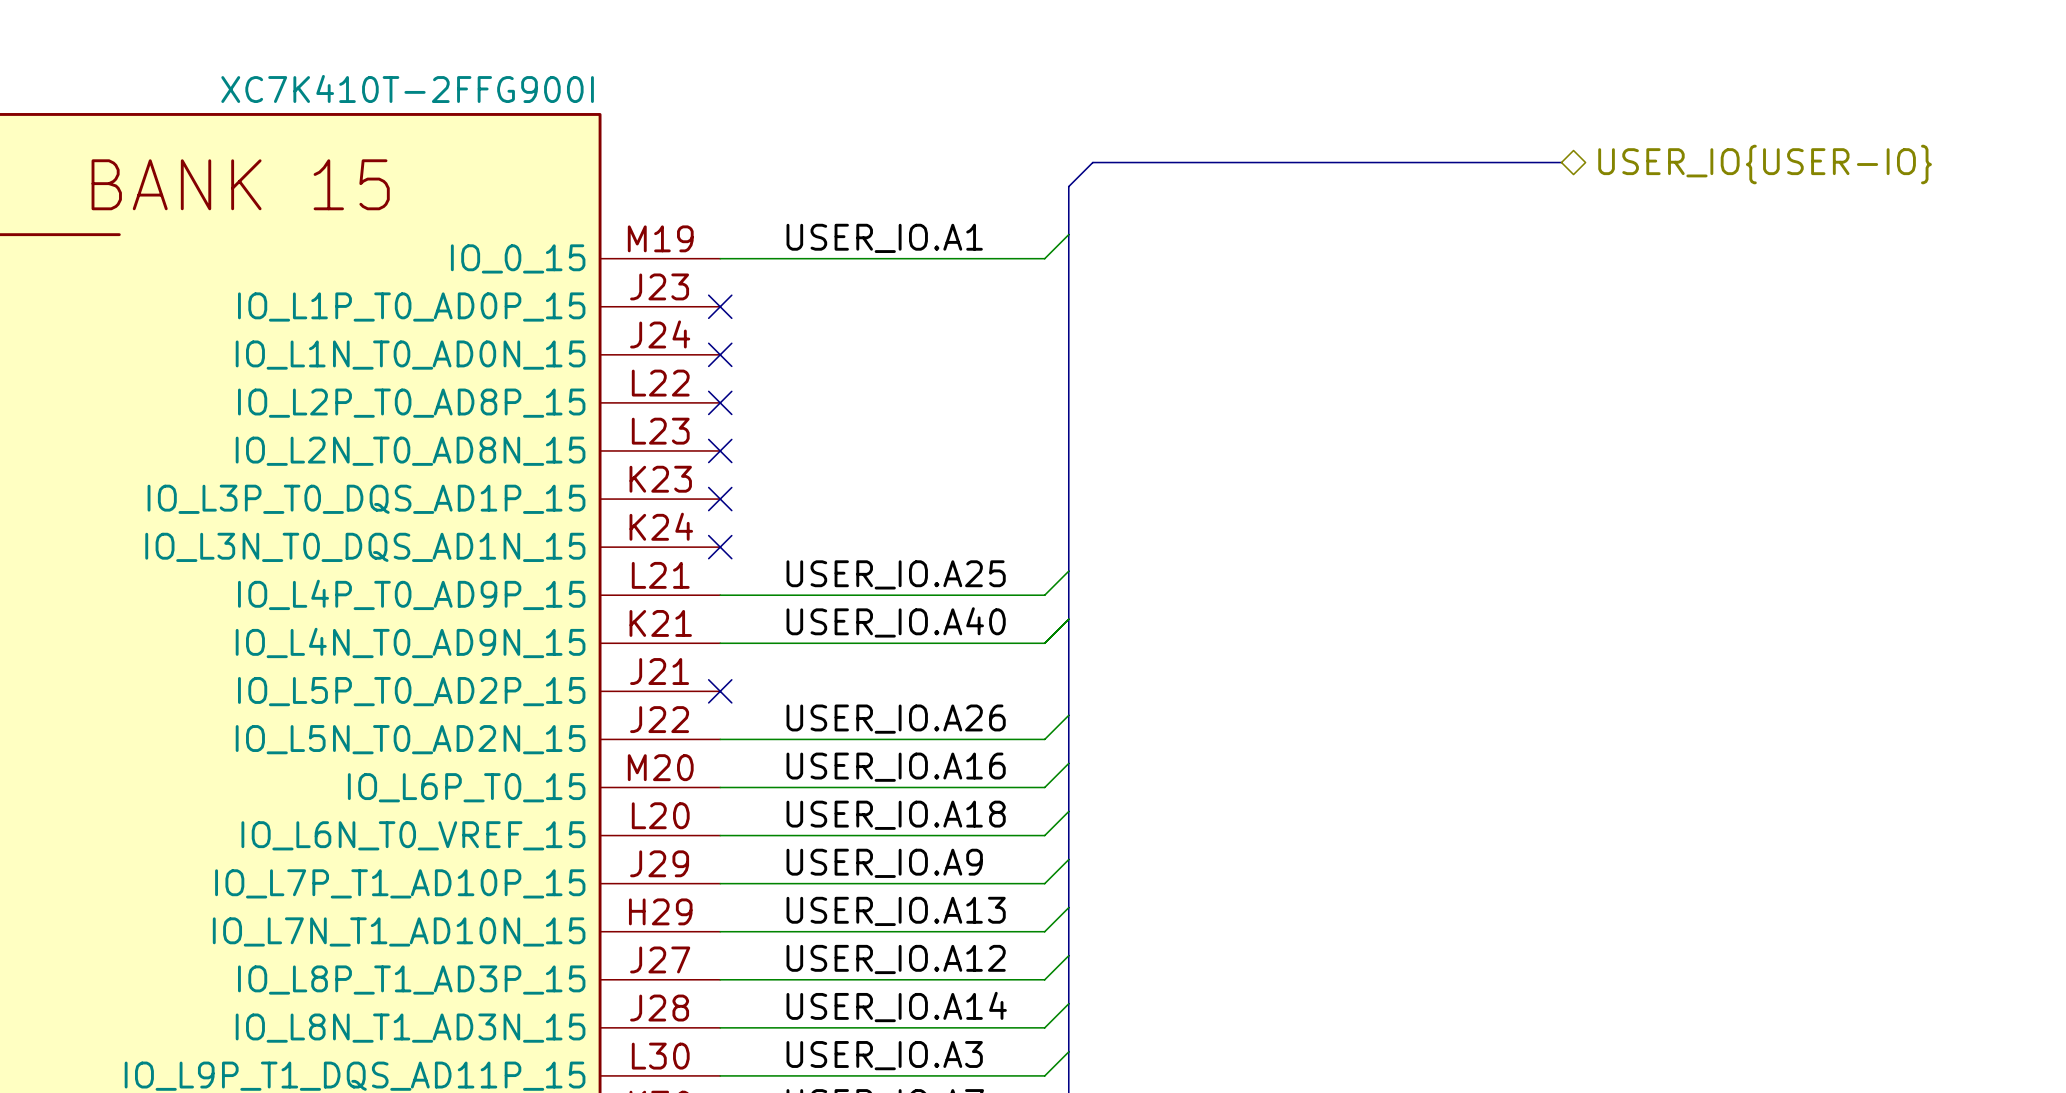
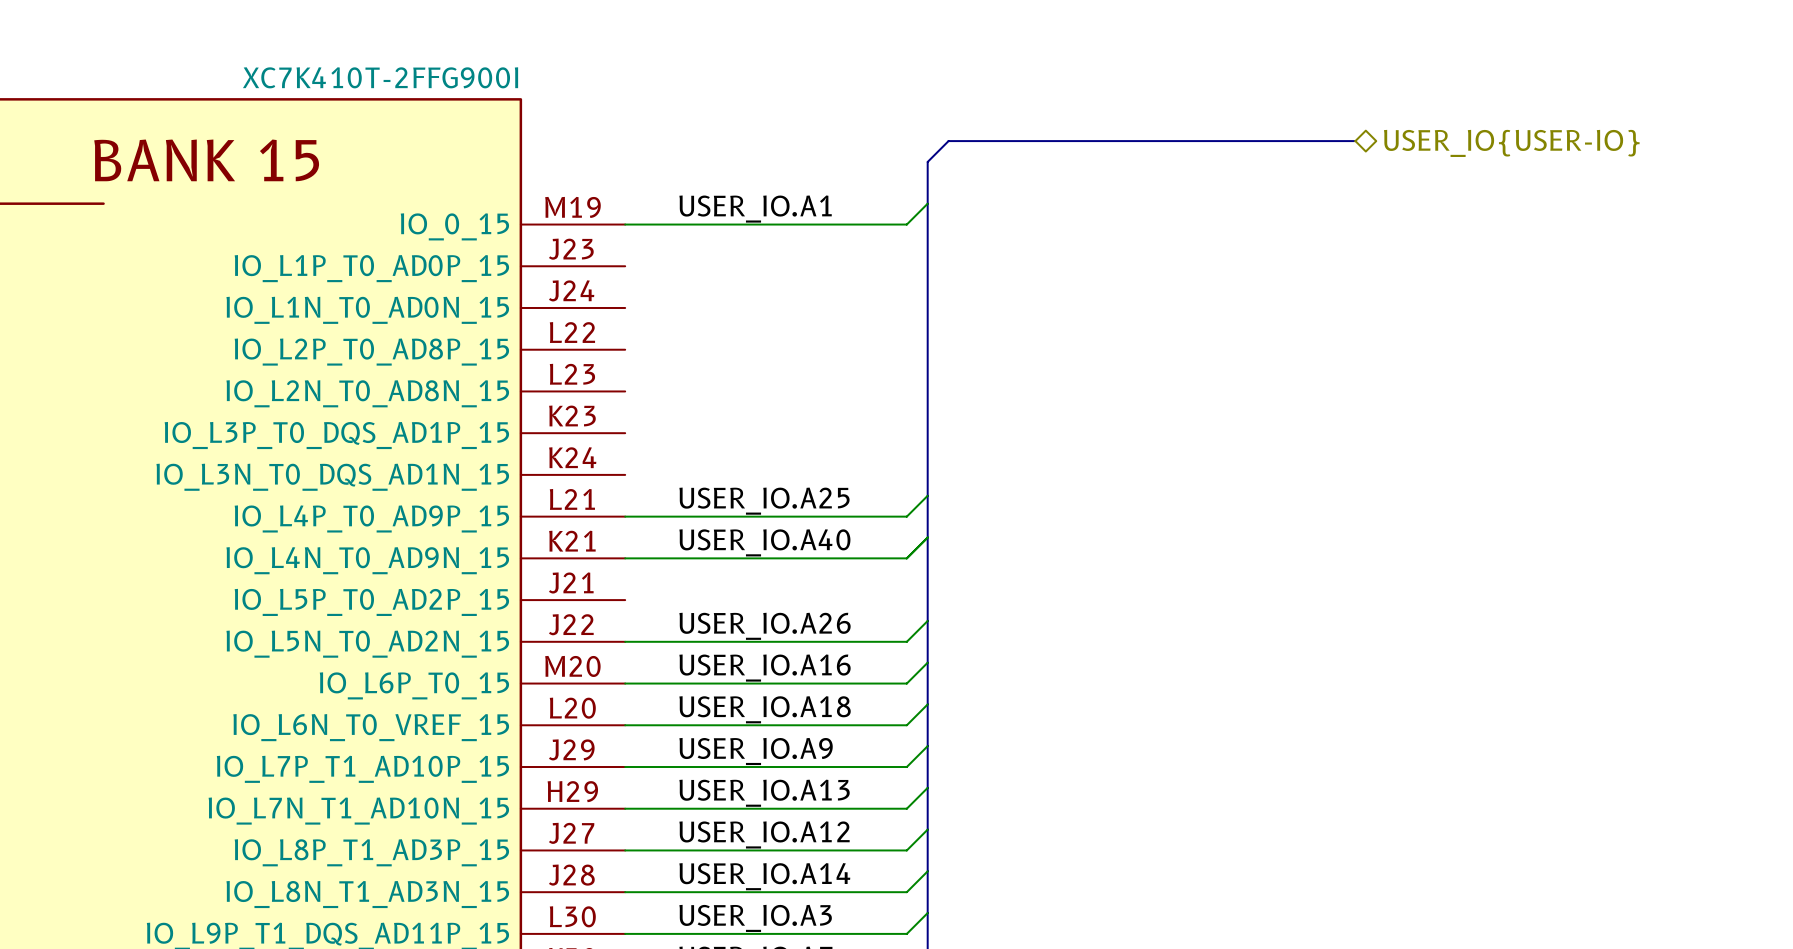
no-connect mark: (720, 306) -> none
no-connect mark: (720, 354) -> none
no-connect mark: (720, 402) -> none
no-connect mark: (720, 450) -> none
no-connect mark: (720, 499) -> none
no-connect mark: (720, 547) -> none
no-connect mark: (720, 691) -> none

